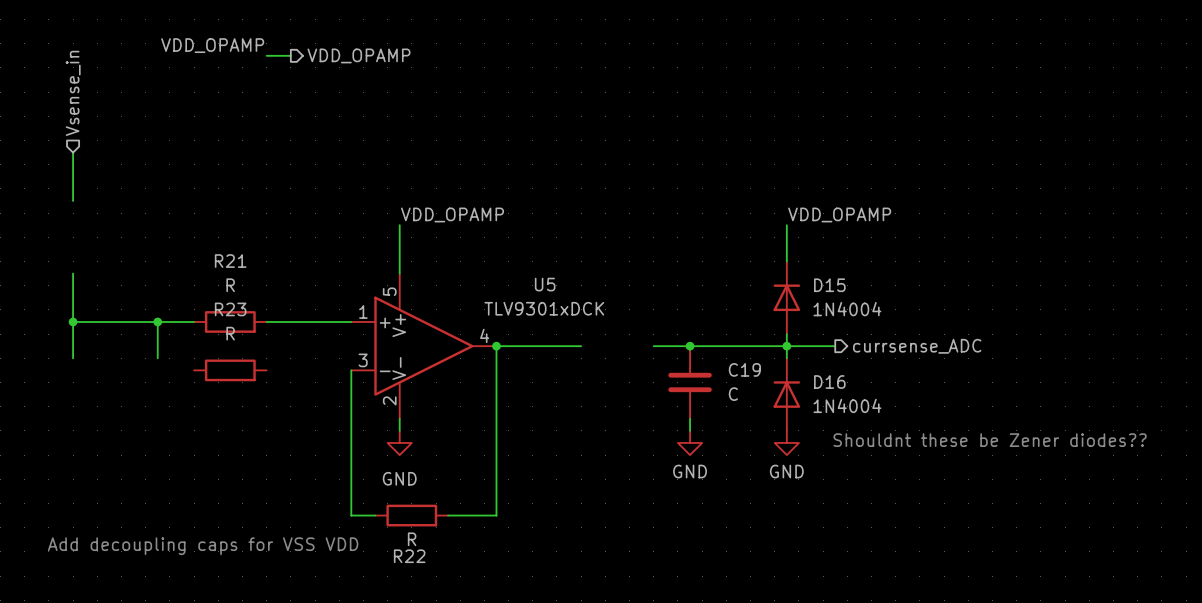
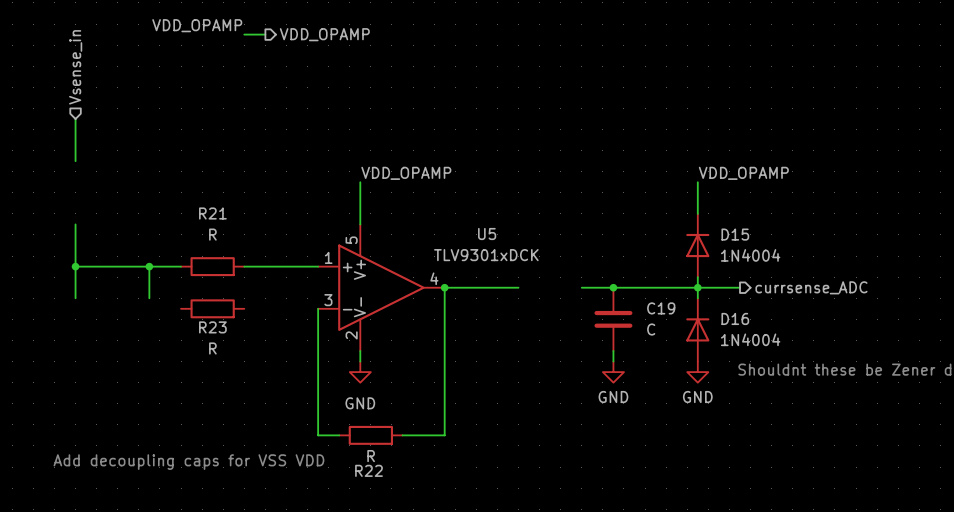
R23 name position: R23 (230, 309) -> R23 (212, 327)
R23 value position: R (230, 333) -> R (212, 348)

